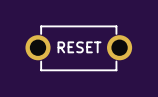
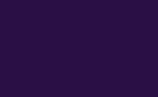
part: (78, 48) -> none

